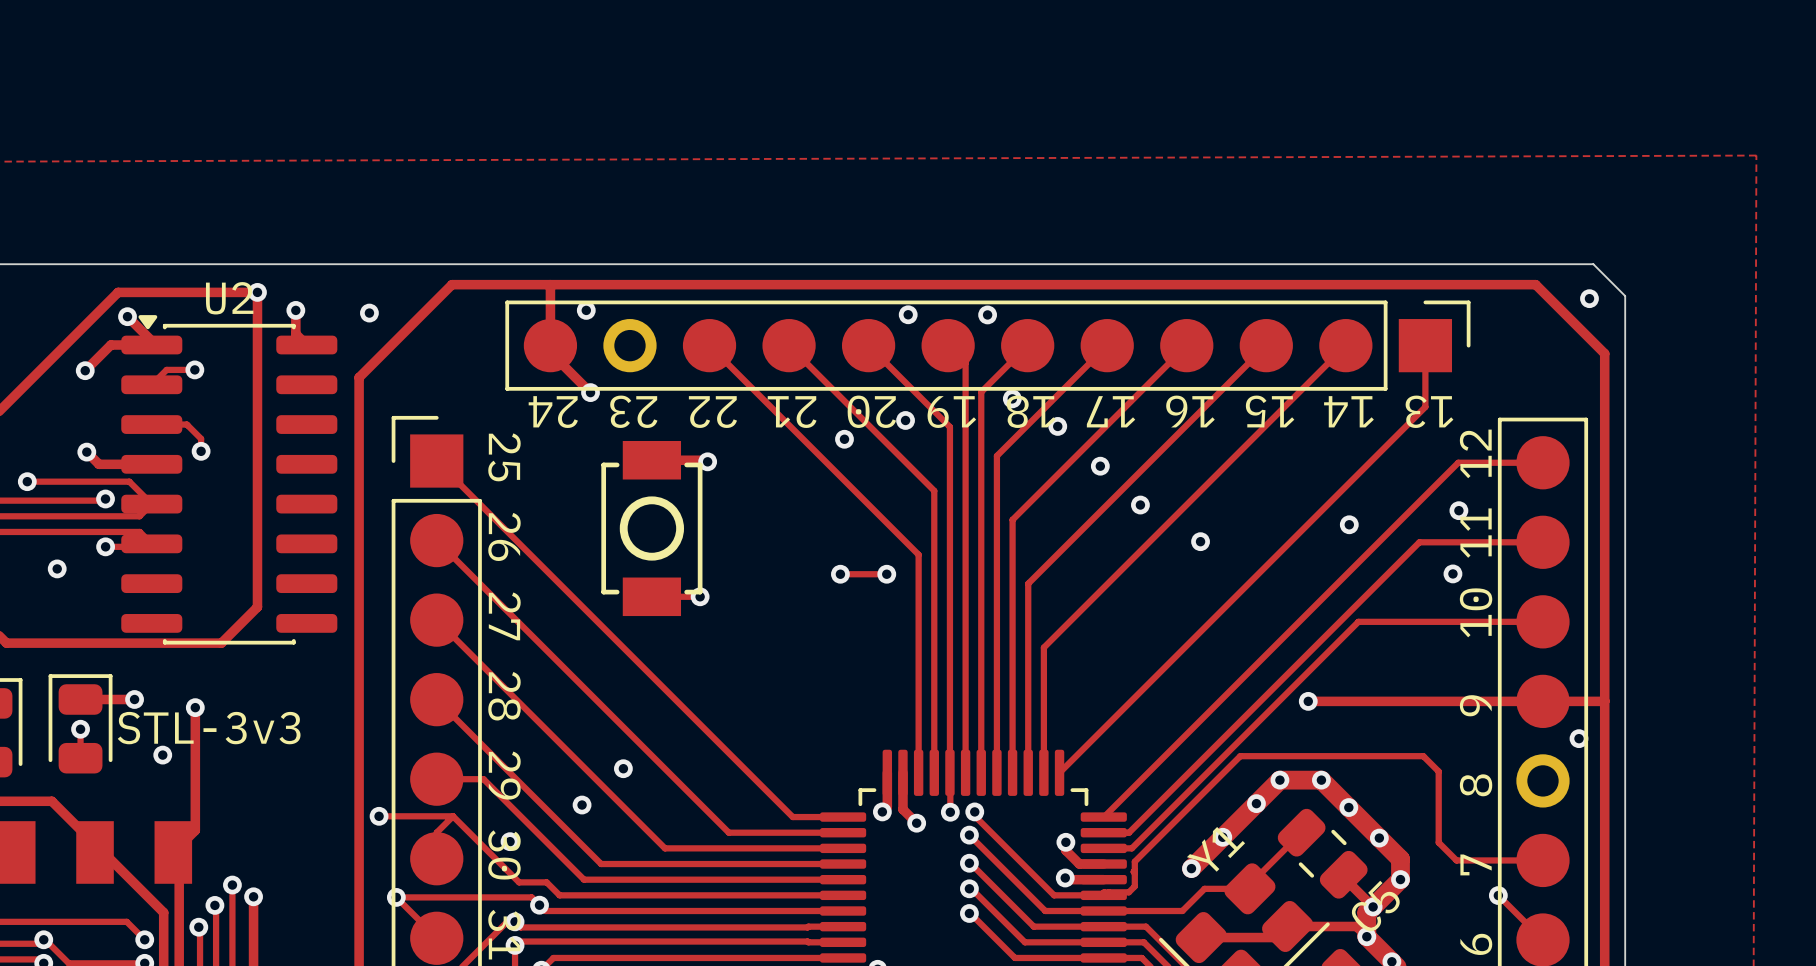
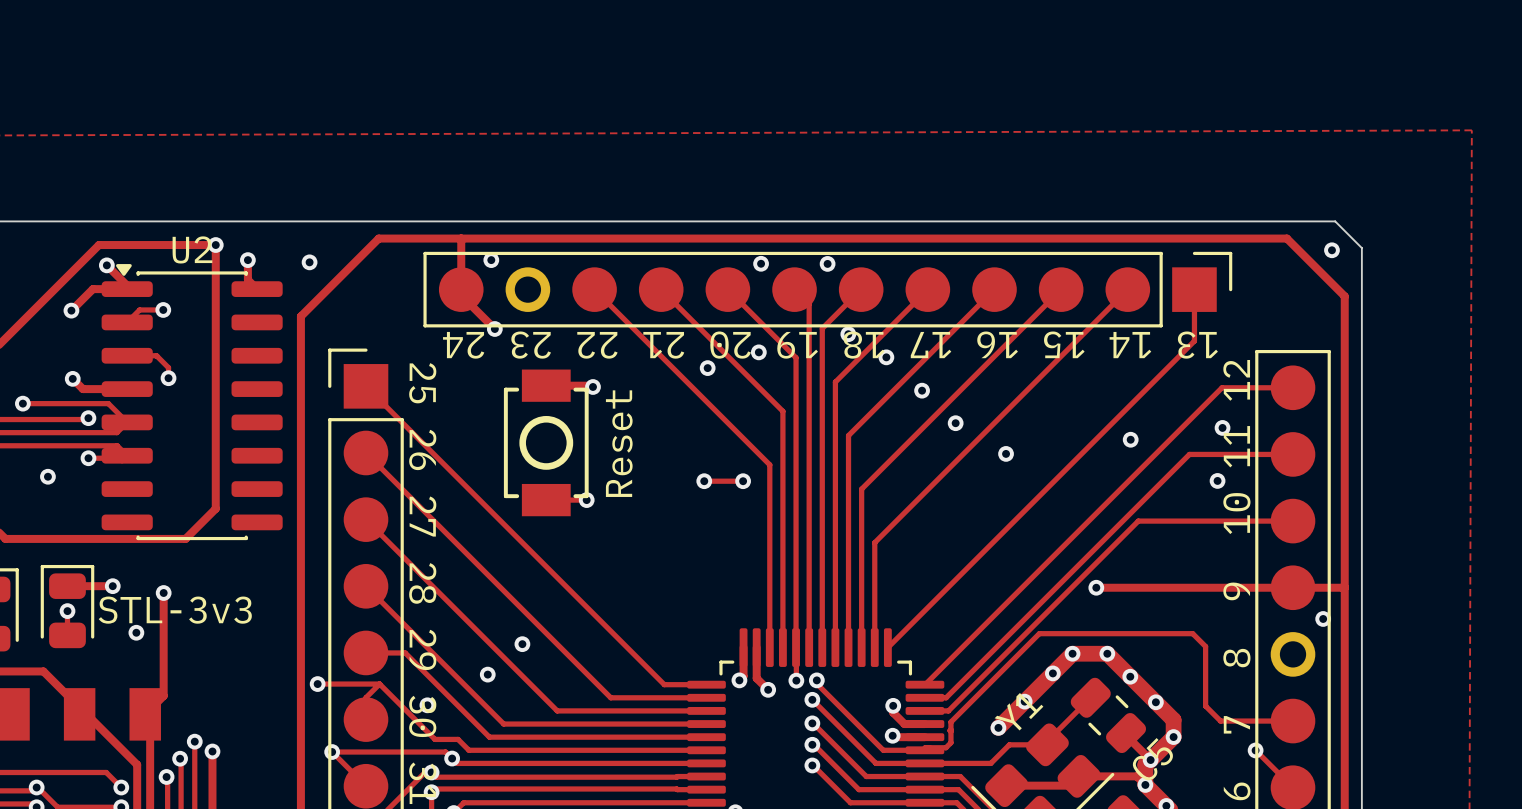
text: none -> Reset (619, 443)

